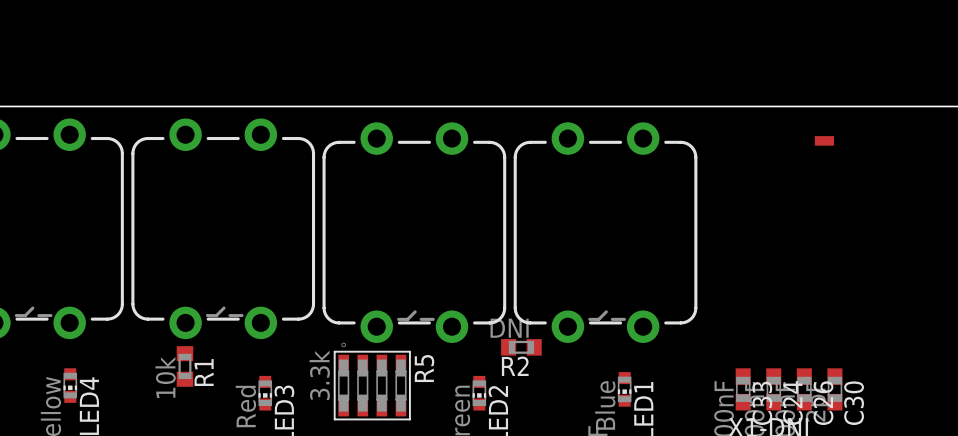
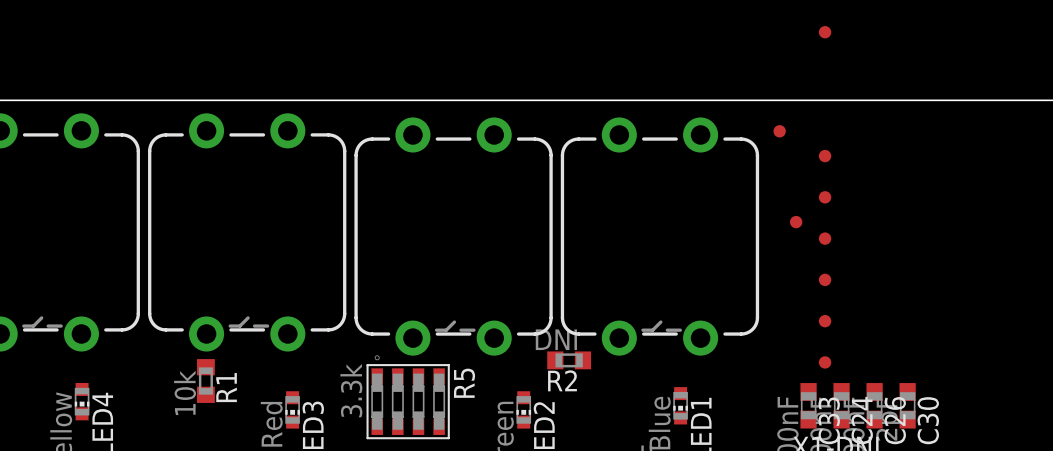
part: none -> (825, 32)
part: none -> (779, 131)
part: (824, 140) -> none
part: none -> (825, 156)
part: none -> (825, 197)
part: none -> (796, 222)
part: none -> (825, 238)
part: none -> (825, 279)
part: none -> (825, 321)
part: none -> (825, 362)

